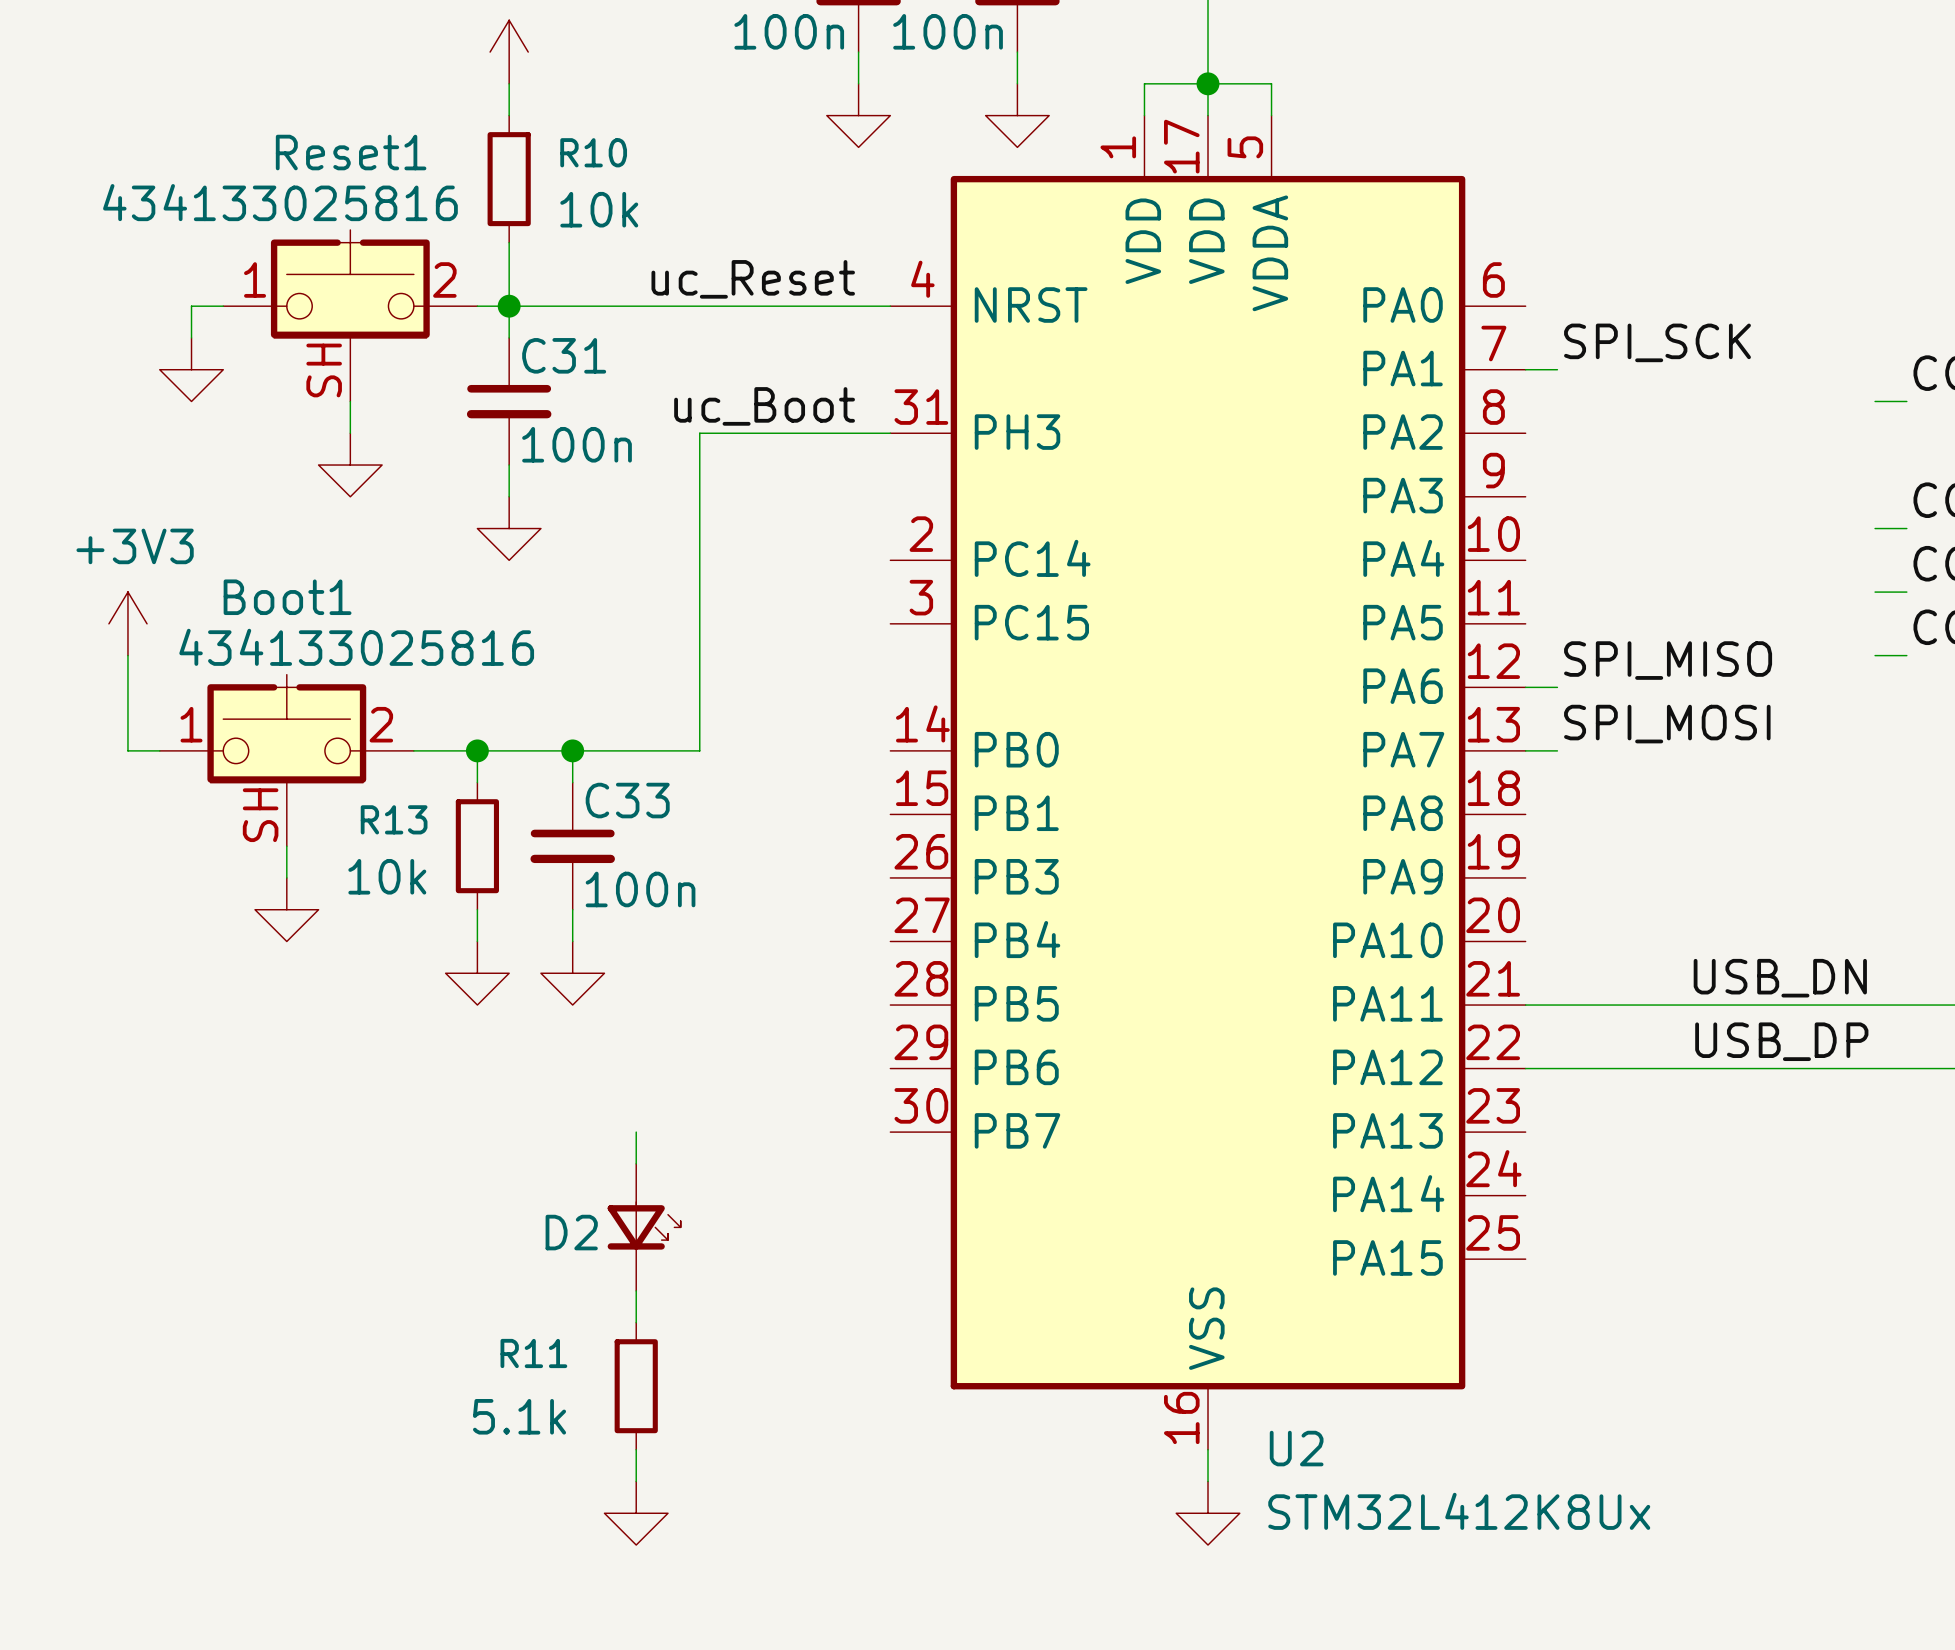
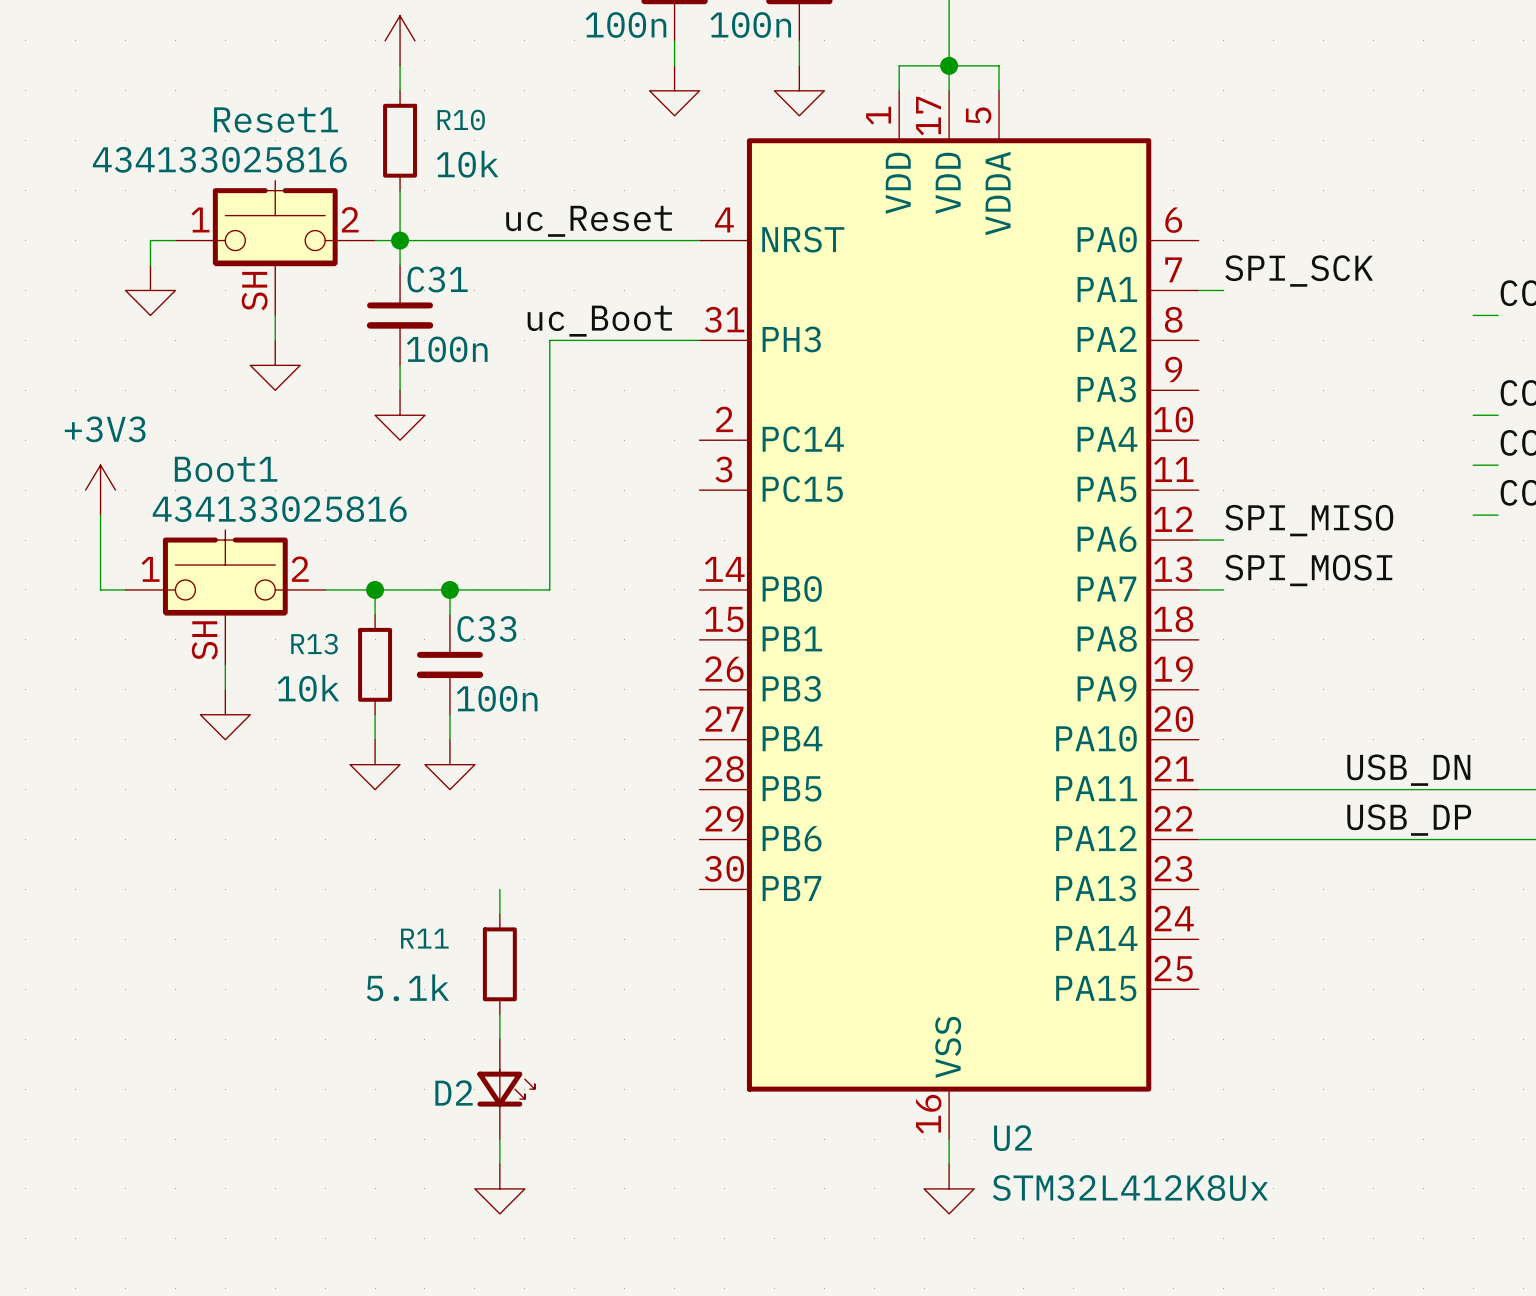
D2 position: (644, 1227) -> (506, 1089)
R11 position: (636, 1386) -> (499, 964)

